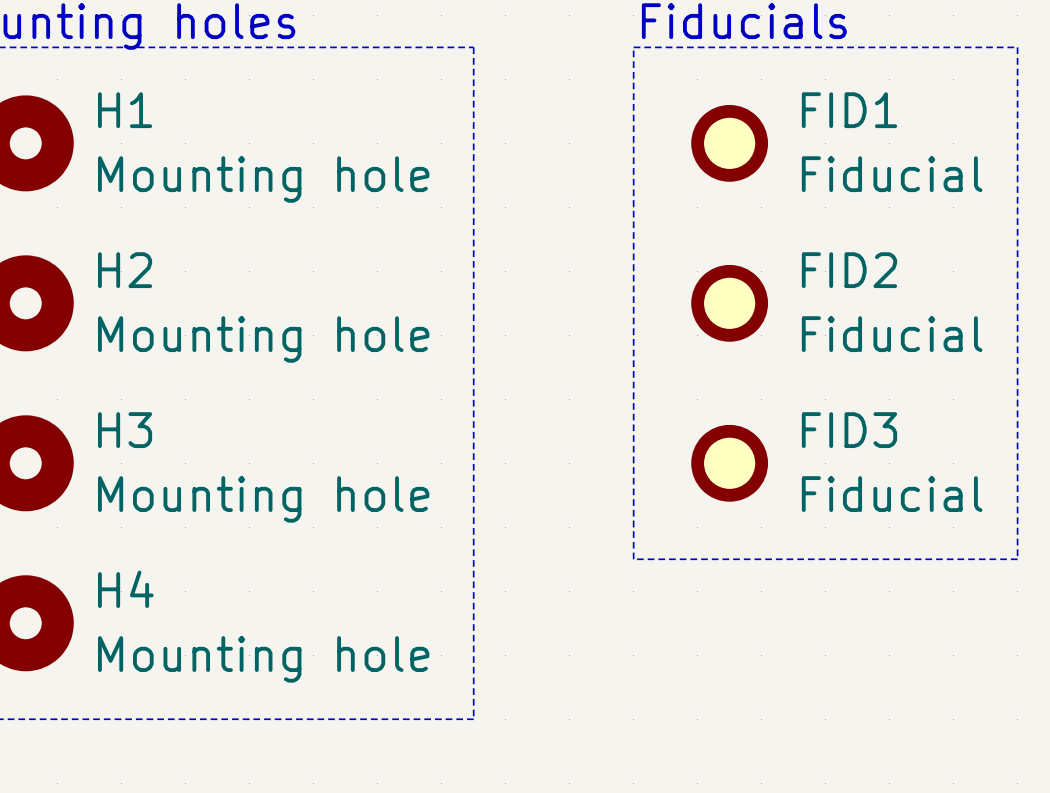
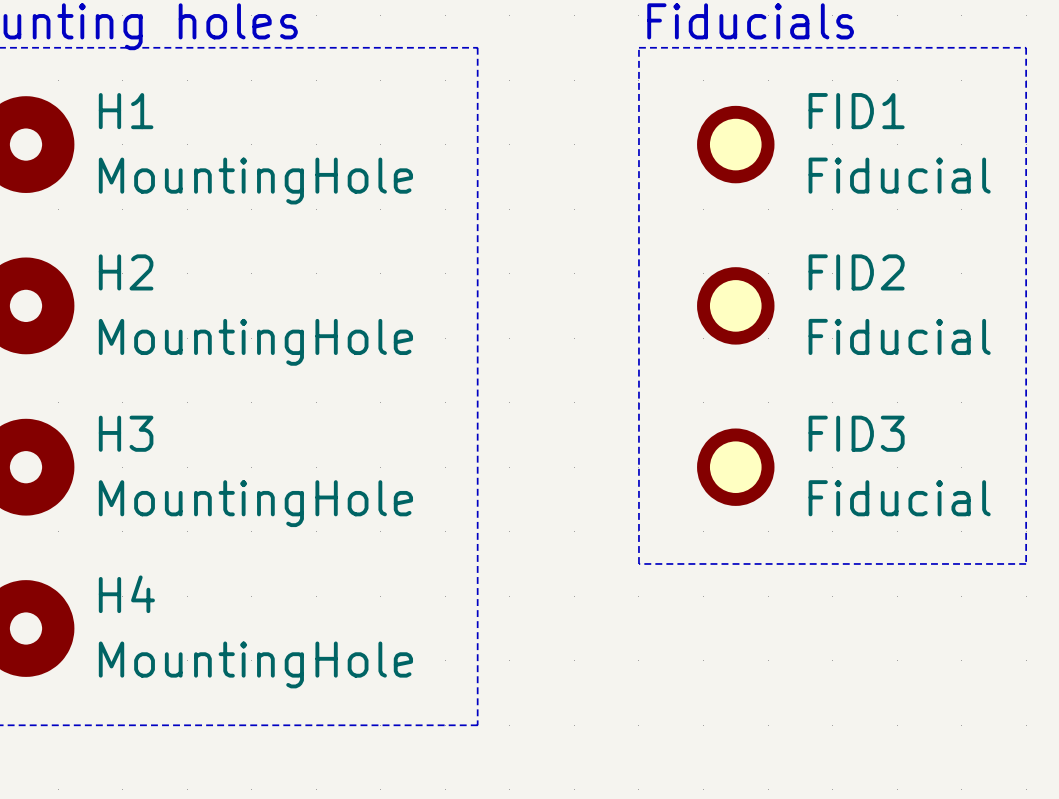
H1 value: Mounting hole (263, 179) -> MountingHole (255, 181)
H2 value: Mounting hole (263, 339) -> MountingHole (255, 342)
H3 value: Mounting hole (263, 499) -> MountingHole (255, 503)
H4 value: Mounting hole (263, 659) -> MountingHole (255, 664)

